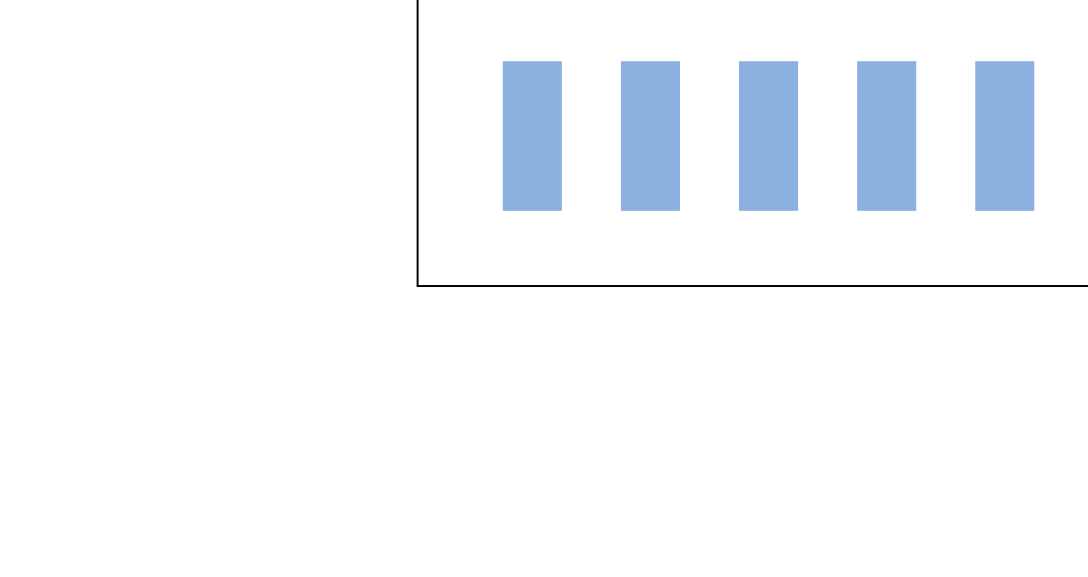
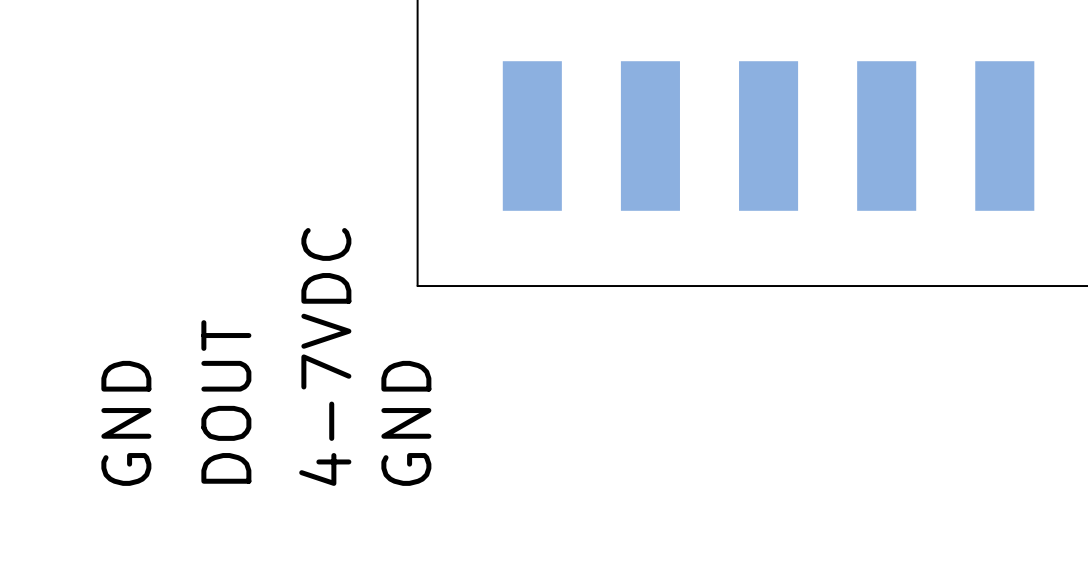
text: none -> 4-7VDC (325, 356)
text: none -> DOUT (226, 401)
text: none -> GND (126, 423)
text: none -> GND (406, 423)

